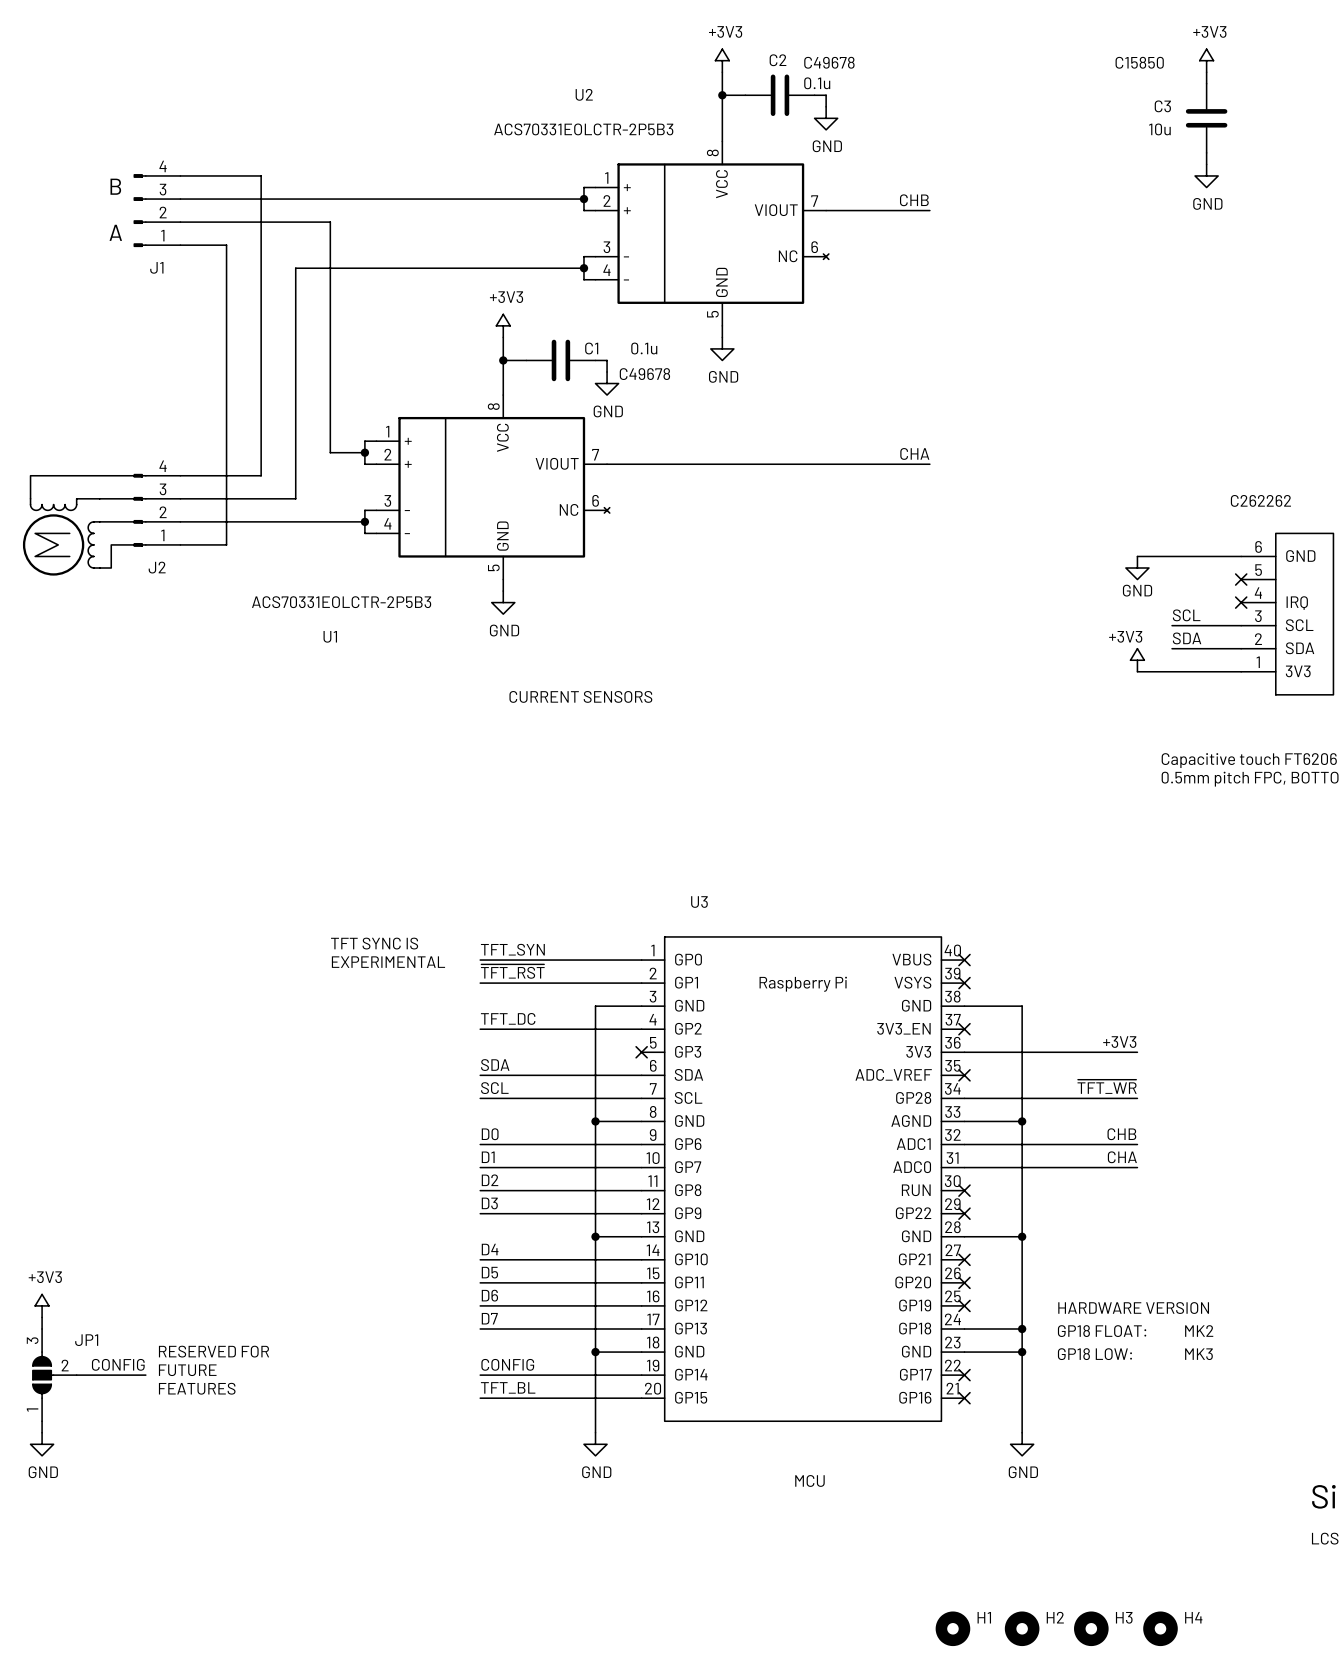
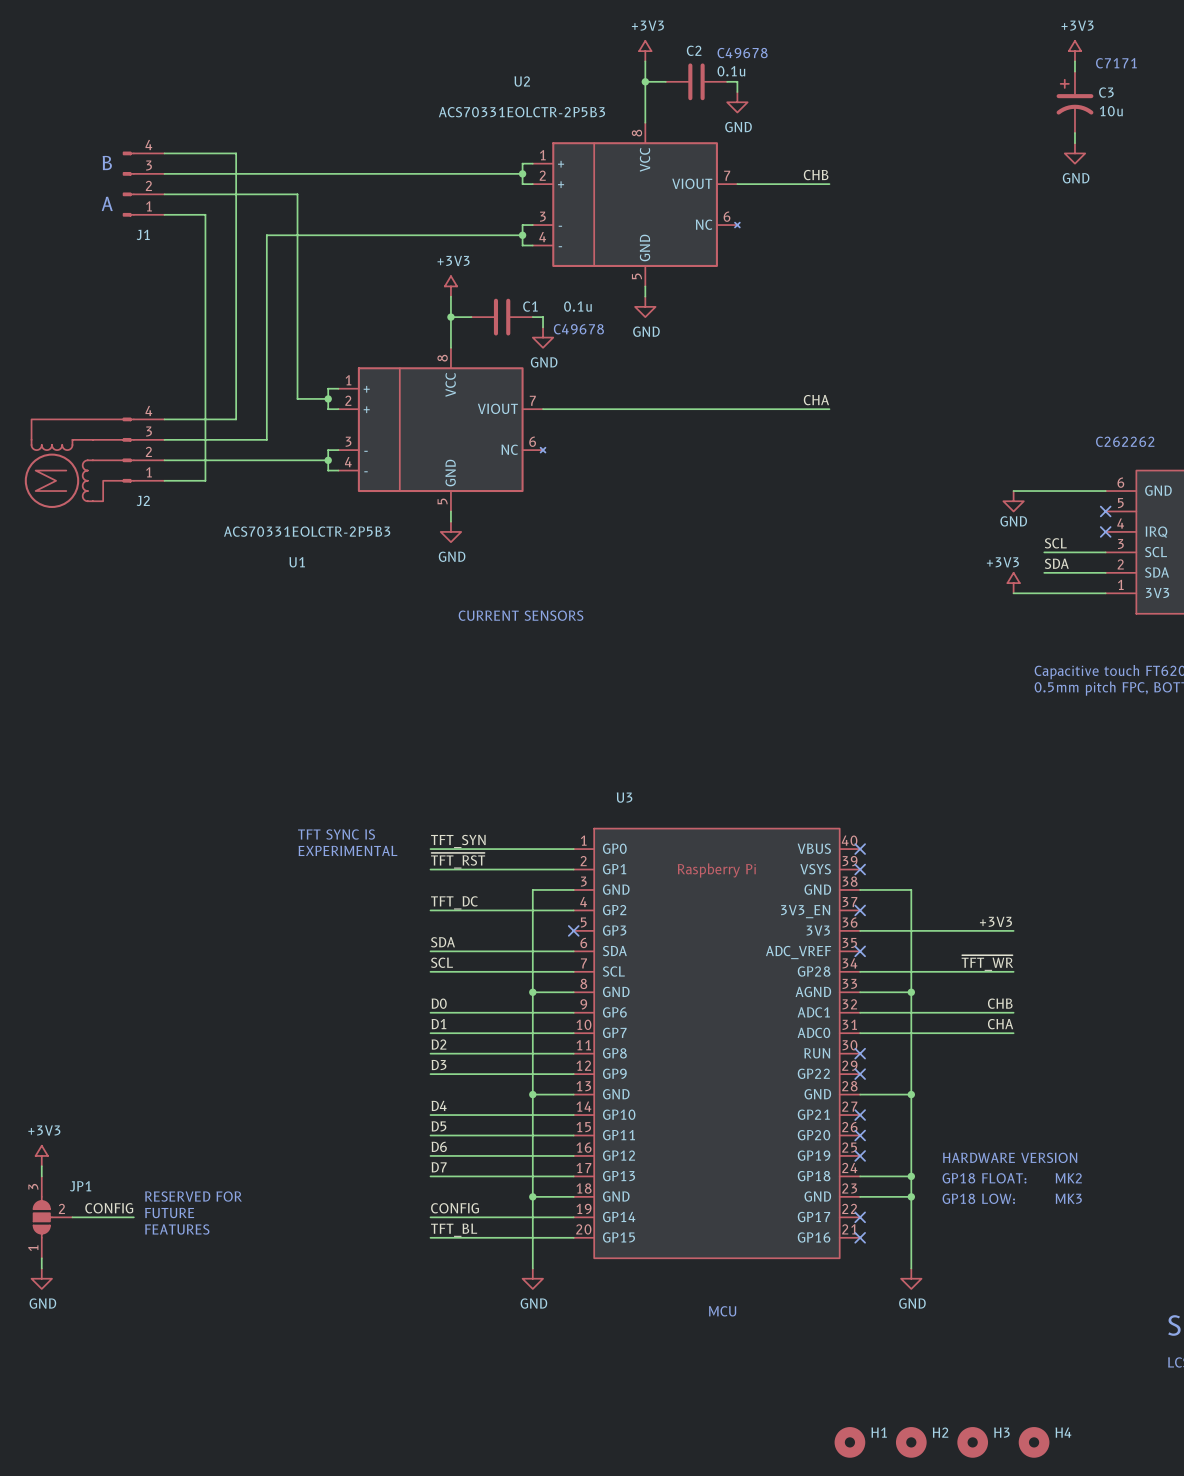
text: C15850 (1139, 62) -> none
text: none -> C7171 (1116, 63)
C3 symbol: [1185, 83, 1228, 153] -> [1056, 71, 1094, 133]
C3 name position: C3 (1162, 106) -> C3 (1106, 92)
C3 value position: 10u (1159, 129) -> 10u (1111, 111)

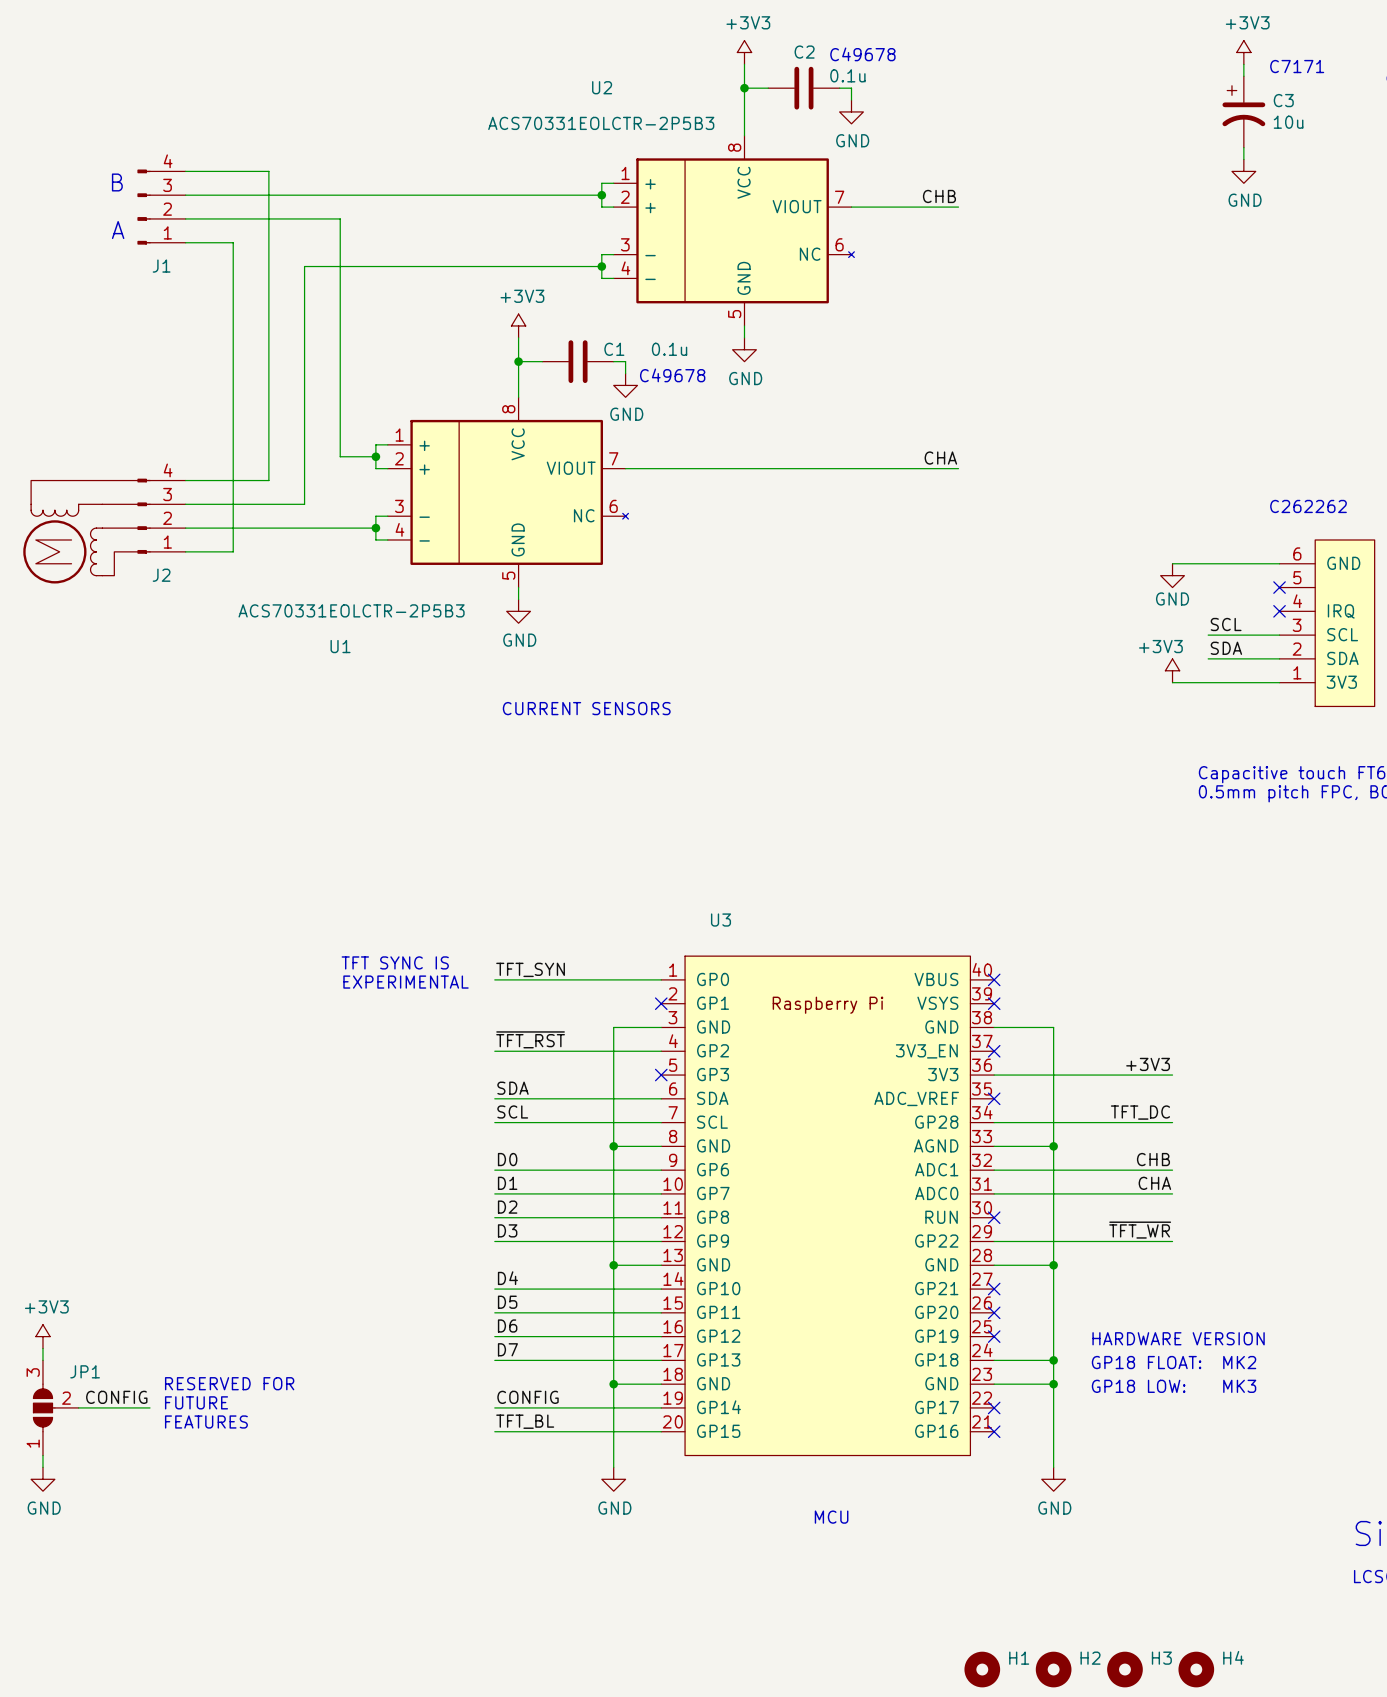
label: ~{TFT_RST} (458, 860) -> none
wire: (430, 869) (573, 869) -> none
no-connect mark: none -> (661, 1003)
label: TFT_DC (454, 902) -> ~{TFT_RST} (530, 1039)
label: ~{TFT_WR} (987, 963) -> TFT_DC (1140, 1112)
label: none -> ~{TFT_WR} (1140, 1230)
wire: none -> (994, 1241) (1172, 1241)
no-connect mark: (860, 1074) -> none

